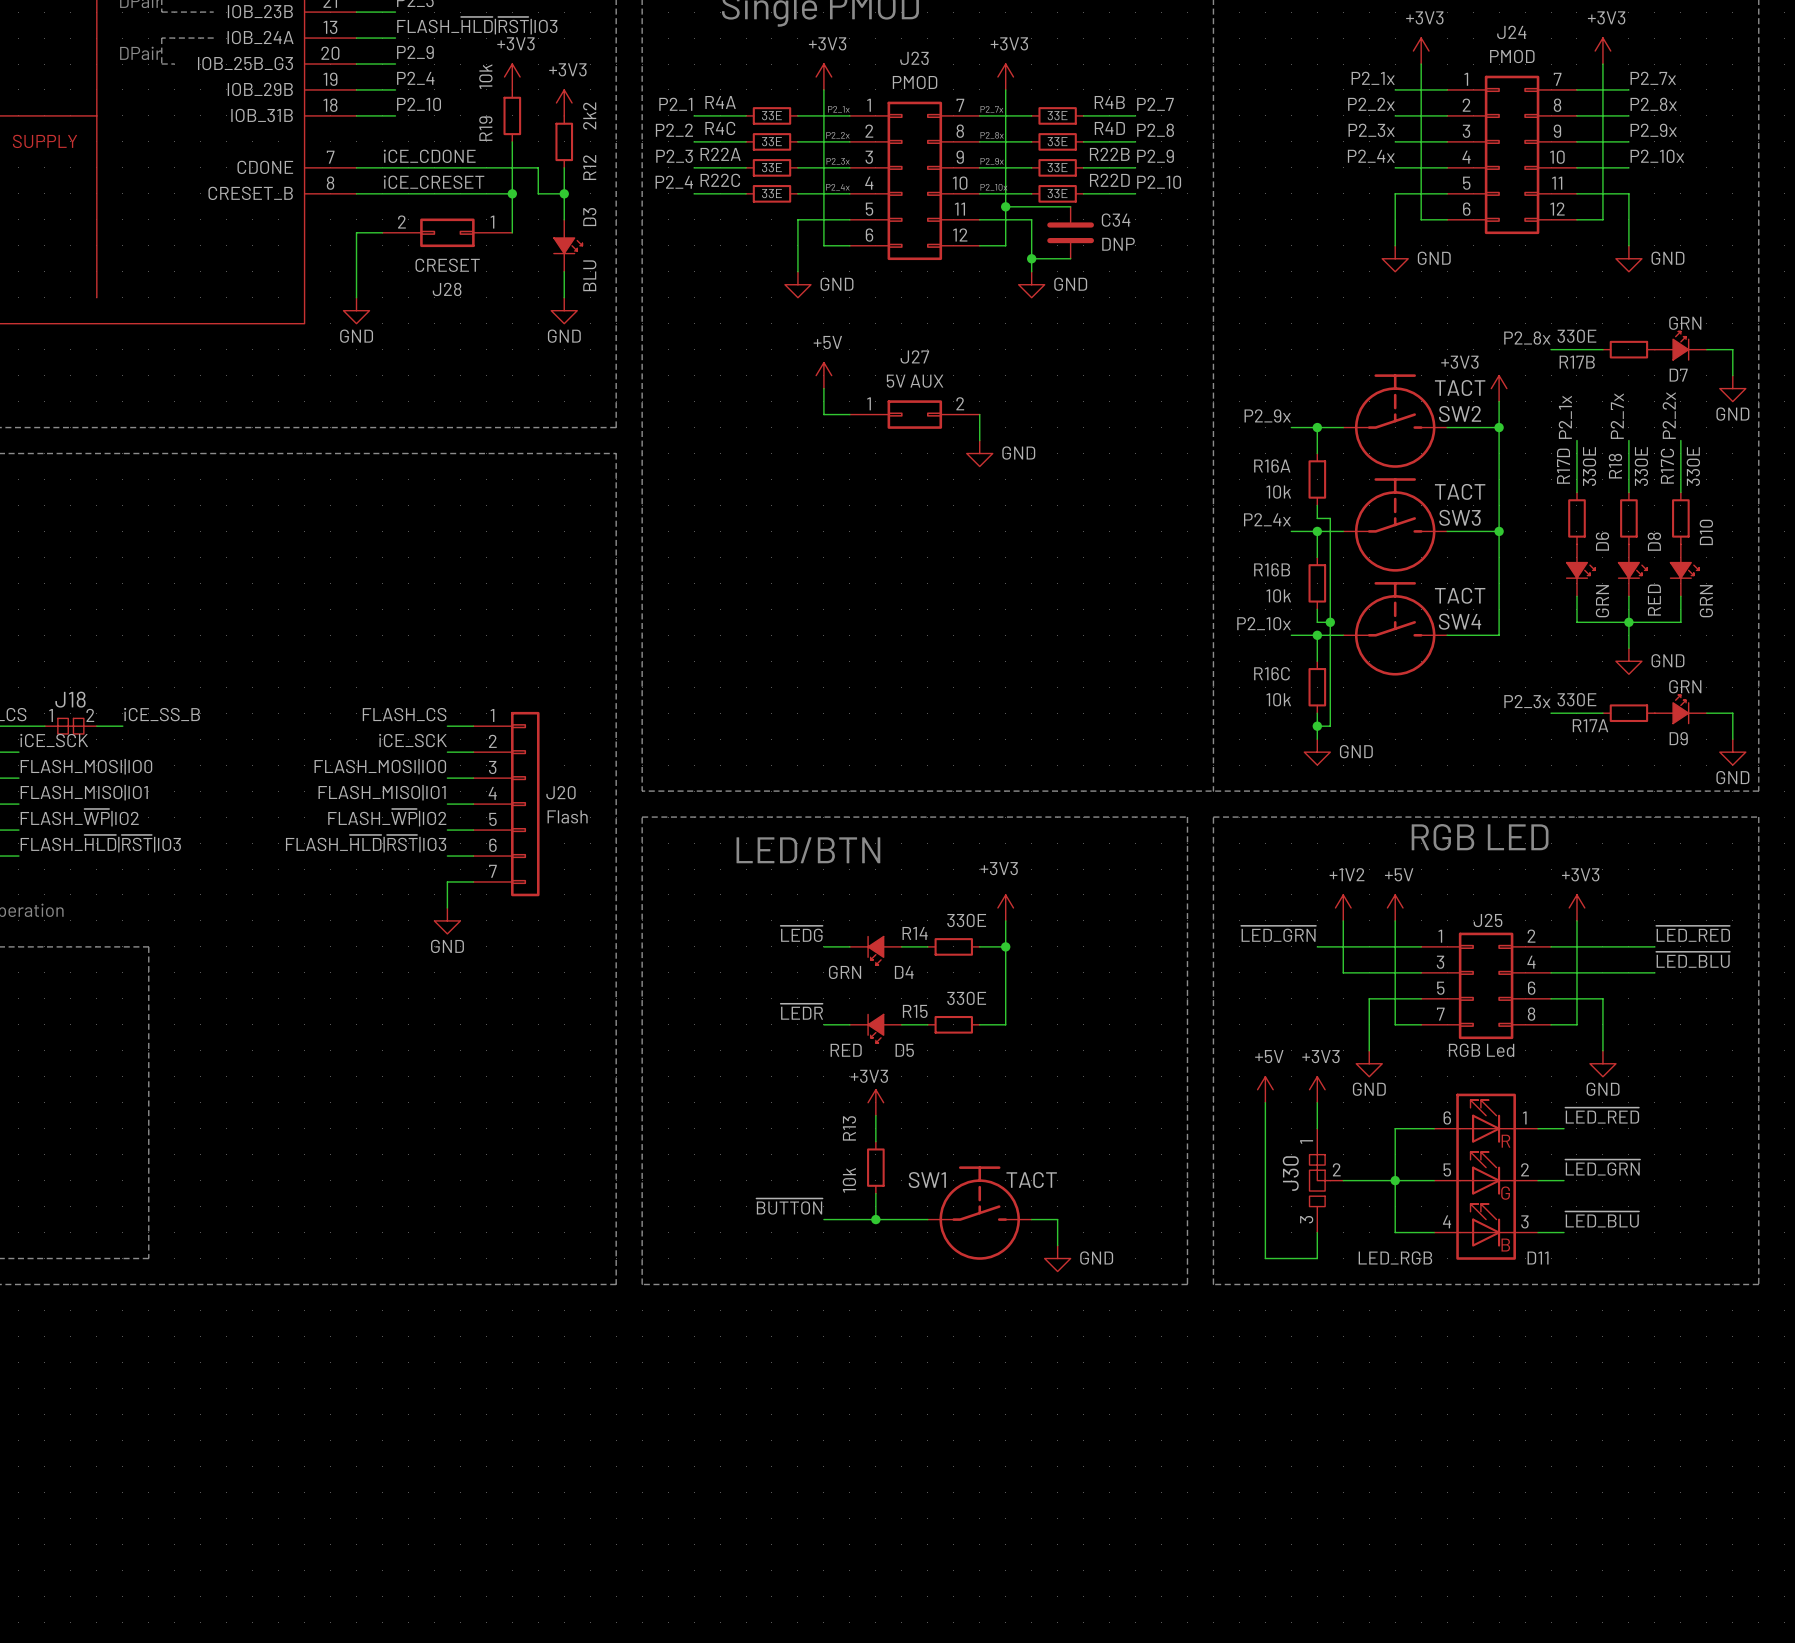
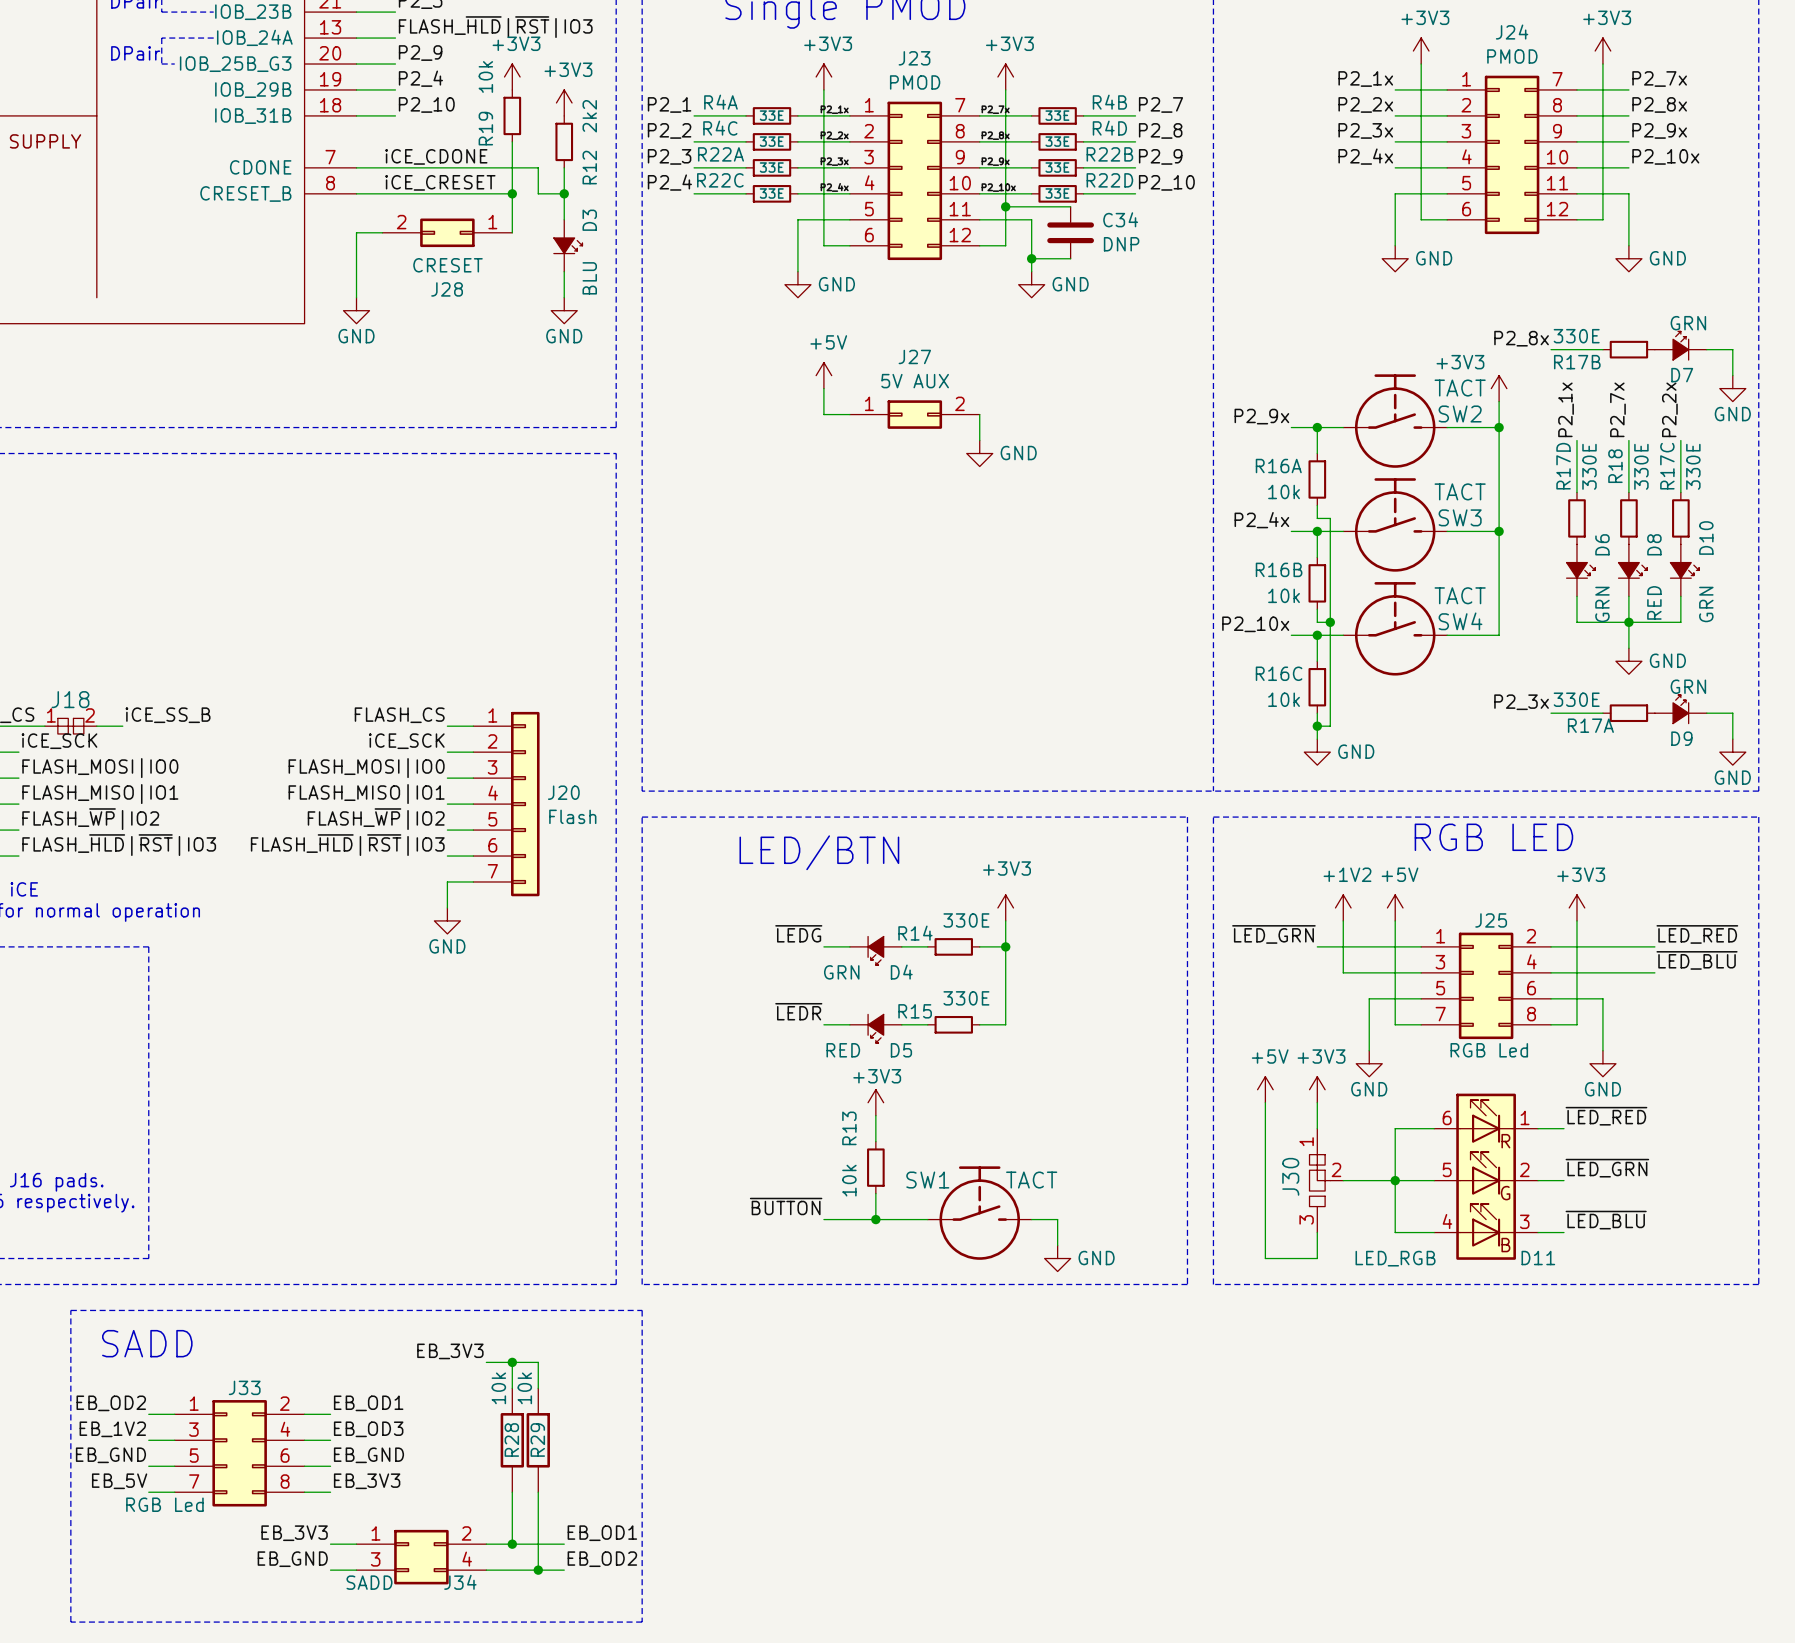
line: none -> (70, 1310) (642, 1310) (642, 1622) (70, 1622) (70, 1310)
text: none -> SADD (147, 1343)
label: none -> EB_3V3 (450, 1351)
wire: none -> (486, 1362) (538, 1362) (538, 1388)
wire: none -> (512, 1362) (512, 1388)
junction: none -> (512, 1362)
label: none -> EB_OD2 (111, 1403)
label: none -> EB_OD1 (368, 1403)
wire: none -> (148, 1414) (174, 1414)
wire: none -> (304, 1414) (330, 1414)
label: none -> EB_1V2 (112, 1429)
label: none -> EB_OD3 (368, 1429)
wire: none -> (148, 1440) (174, 1440)
wire: none -> (304, 1440) (330, 1440)
R28: none -> 10k (512, 1440)
R29: none -> 10k (538, 1440)
J33: none -> RGB Led (239, 1453)
label: none -> EB_GND (110, 1455)
label: none -> EB_GND (368, 1455)
wire: none -> (148, 1466) (174, 1466)
wire: none -> (304, 1466) (330, 1466)
label: none -> EB_5V (119, 1481)
label: none -> EB_3V3 (367, 1481)
wire: none -> (148, 1492) (174, 1492)
wire: none -> (304, 1492) (330, 1492)
wire: none -> (512, 1492) (512, 1544)
wire: none -> (538, 1492) (538, 1570)
label: none -> EB_3V3 (294, 1533)
label: none -> EB_OD1 (602, 1533)
wire: none -> (330, 1544) (356, 1544)
wire: none -> (486, 1544) (564, 1544)
junction: none -> (512, 1544)
J34: none -> SADD (421, 1557)
label: none -> EB_GND (292, 1559)
label: none -> EB_OD2 (602, 1559)
wire: none -> (330, 1570) (356, 1570)
wire: none -> (486, 1570) (564, 1570)
junction: none -> (538, 1570)

